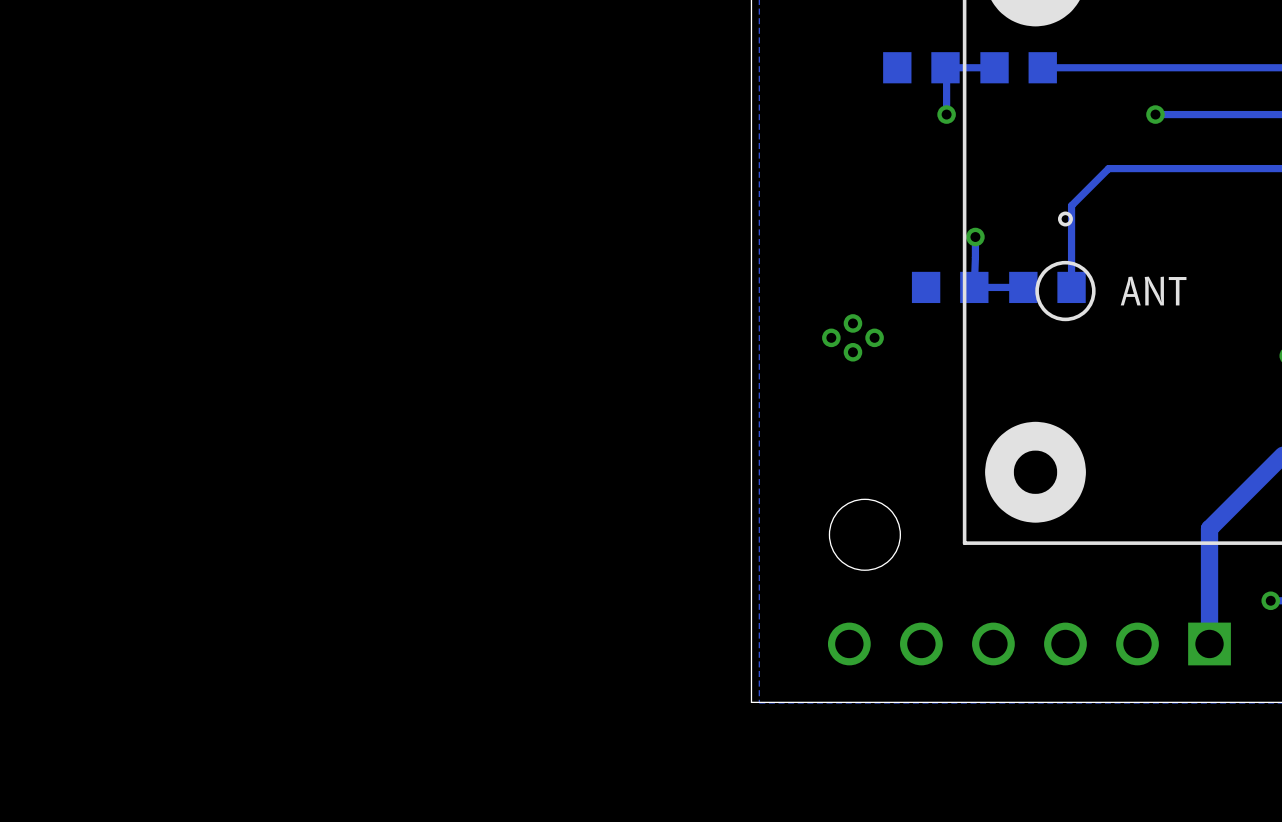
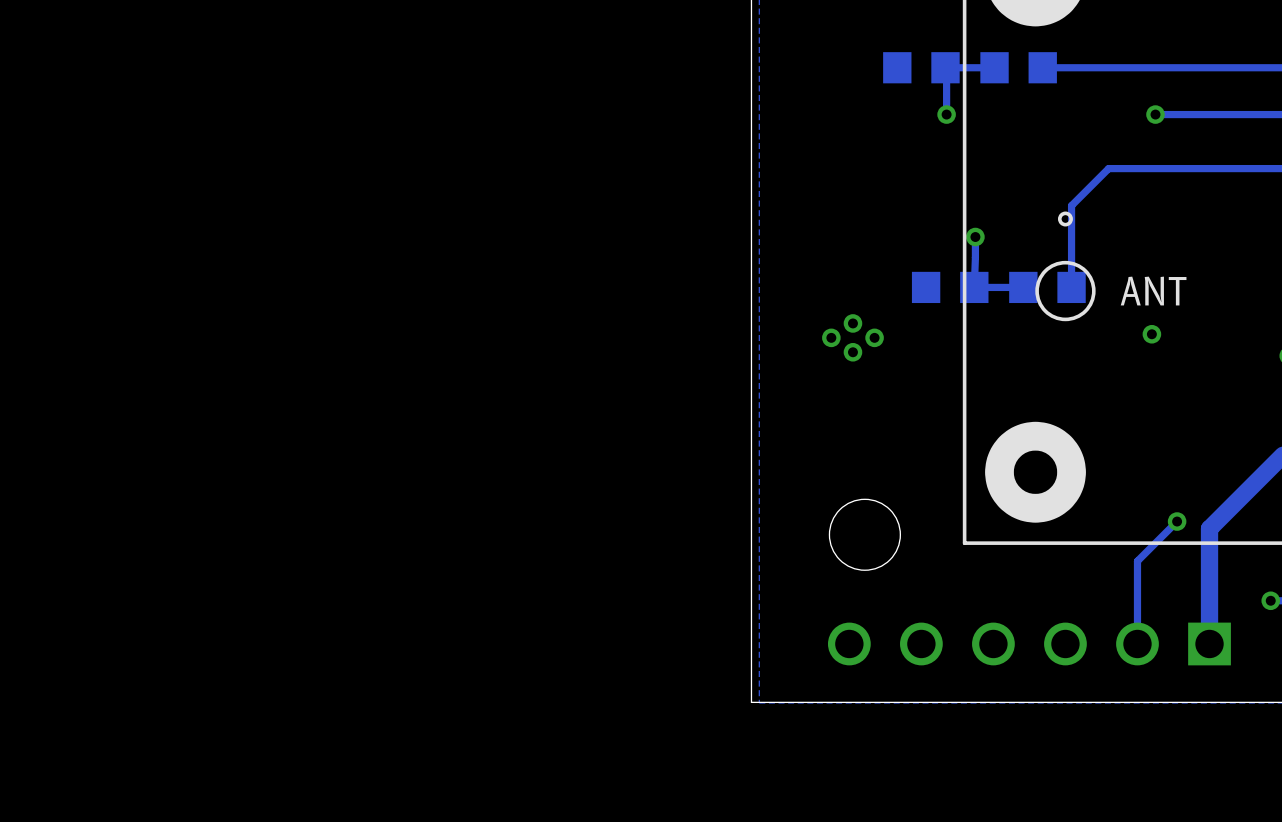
via: none -> (1151, 334)
track: none -> (1177, 521) (1137, 561) (1137, 643)
via: none -> (1177, 521)

